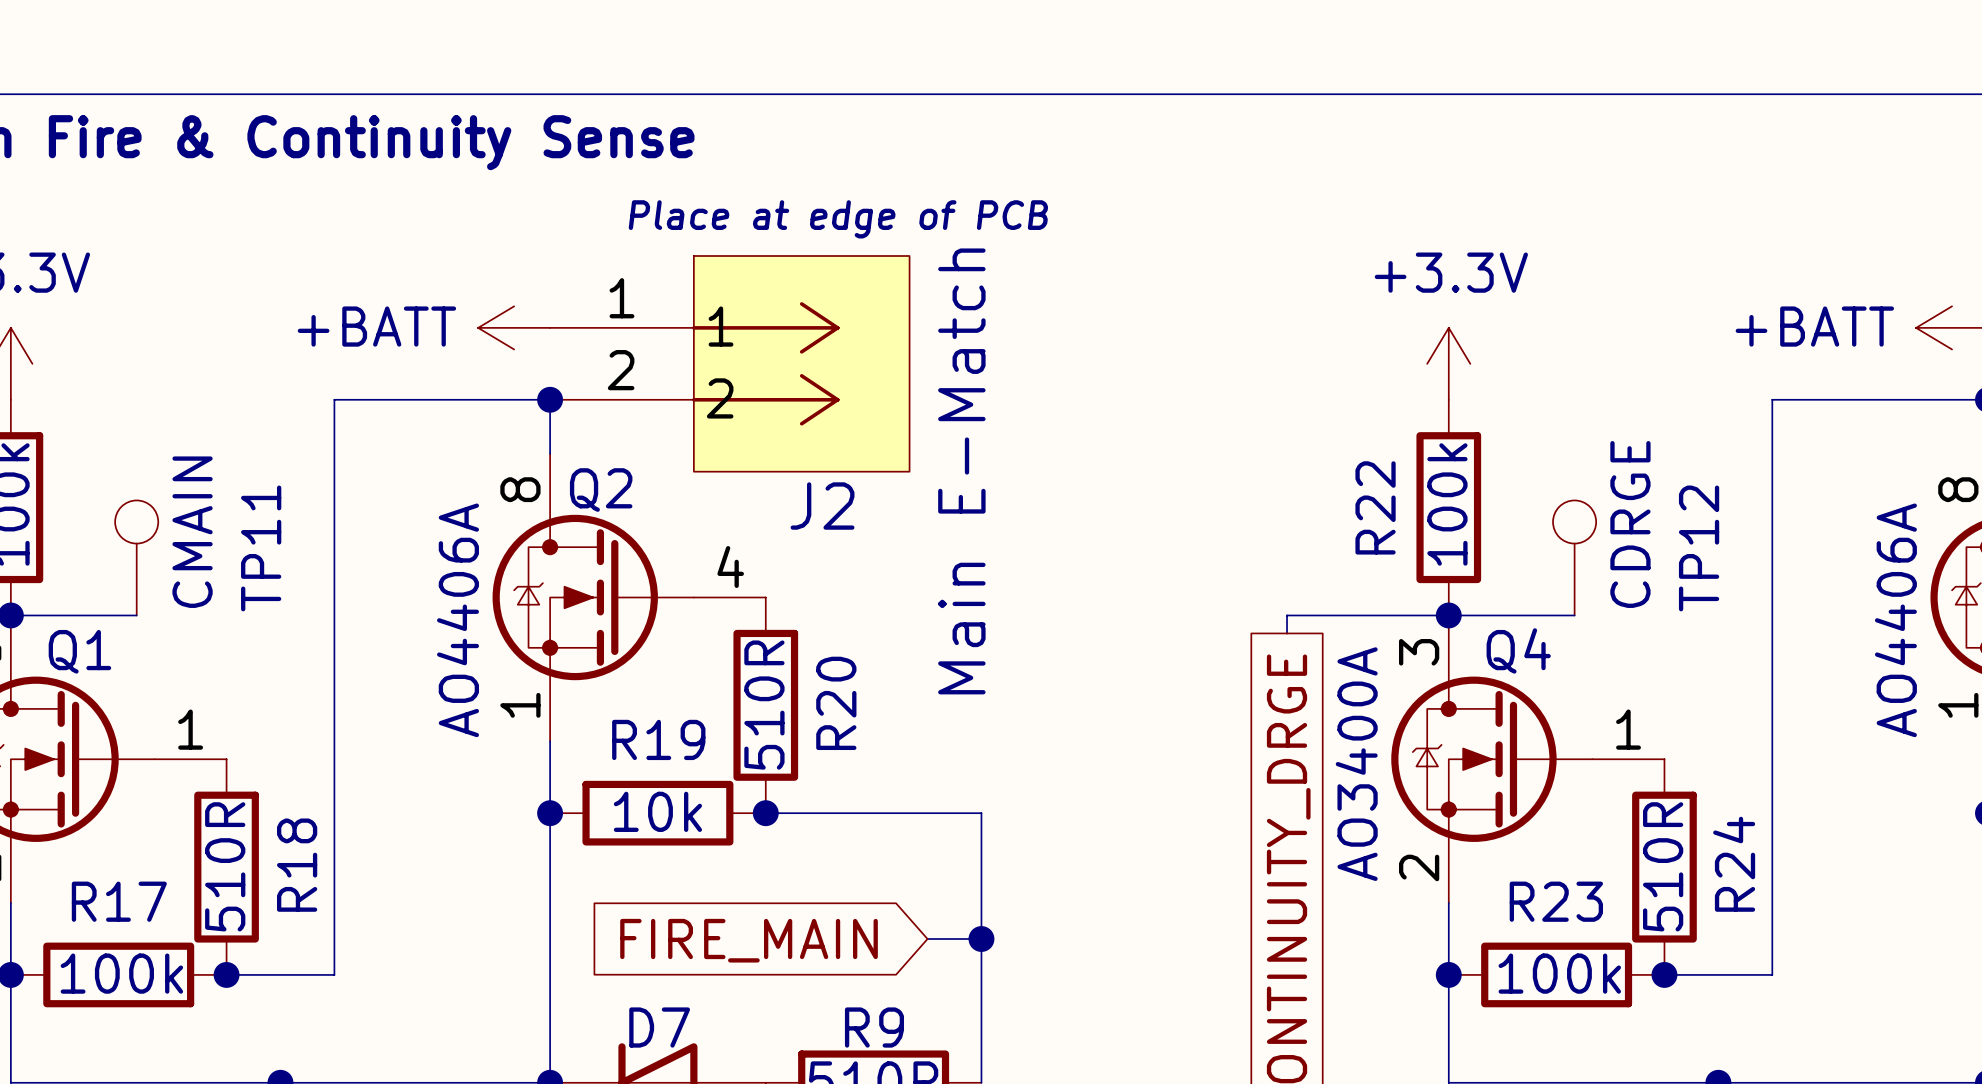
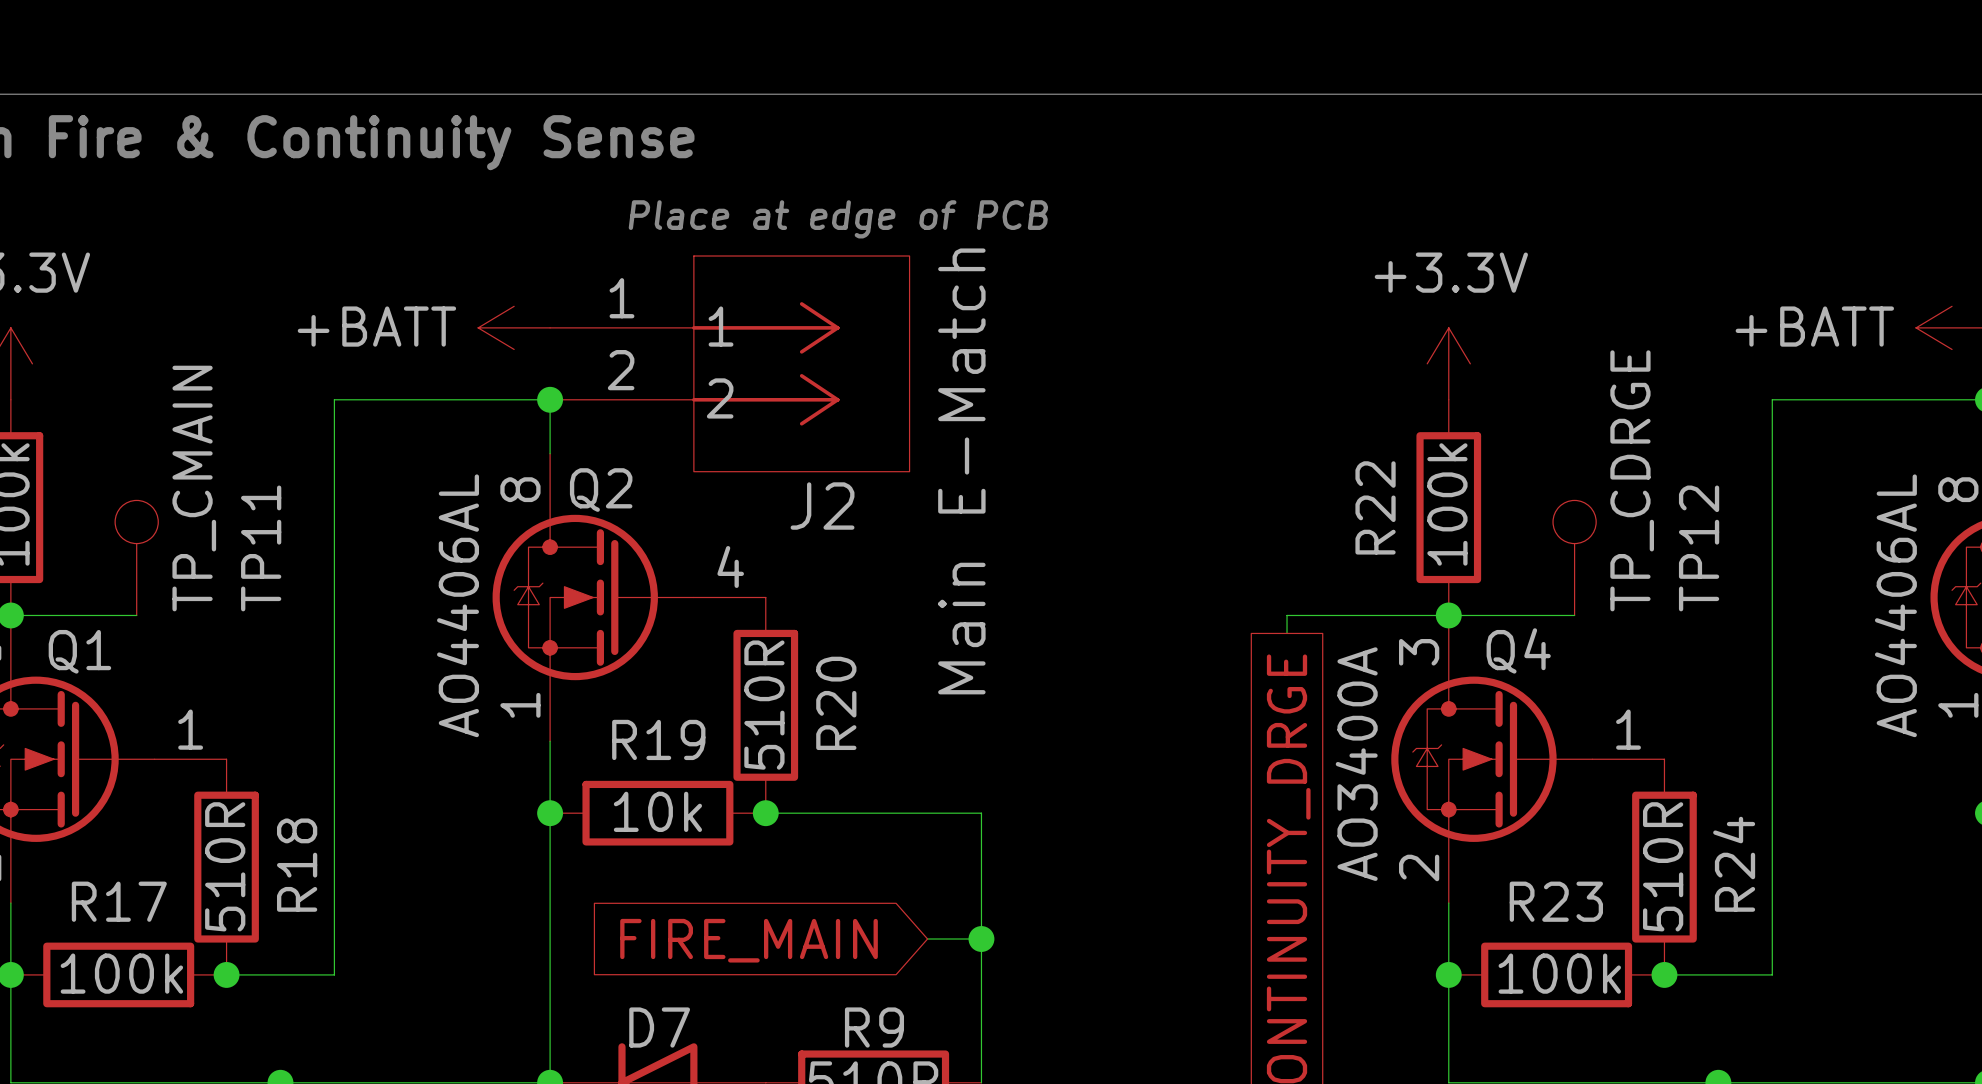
TP12 value: CDRGE (1630, 524) -> TP_CDRGE (1632, 480)
TP11 value: CMAIN (192, 532) -> TP_CMAIN (194, 488)
Q2 value: AO4406A (458, 620) -> AO4406AL (458, 605)
part value: AO4406A (1895, 620) -> AO4406AL (1895, 605)

